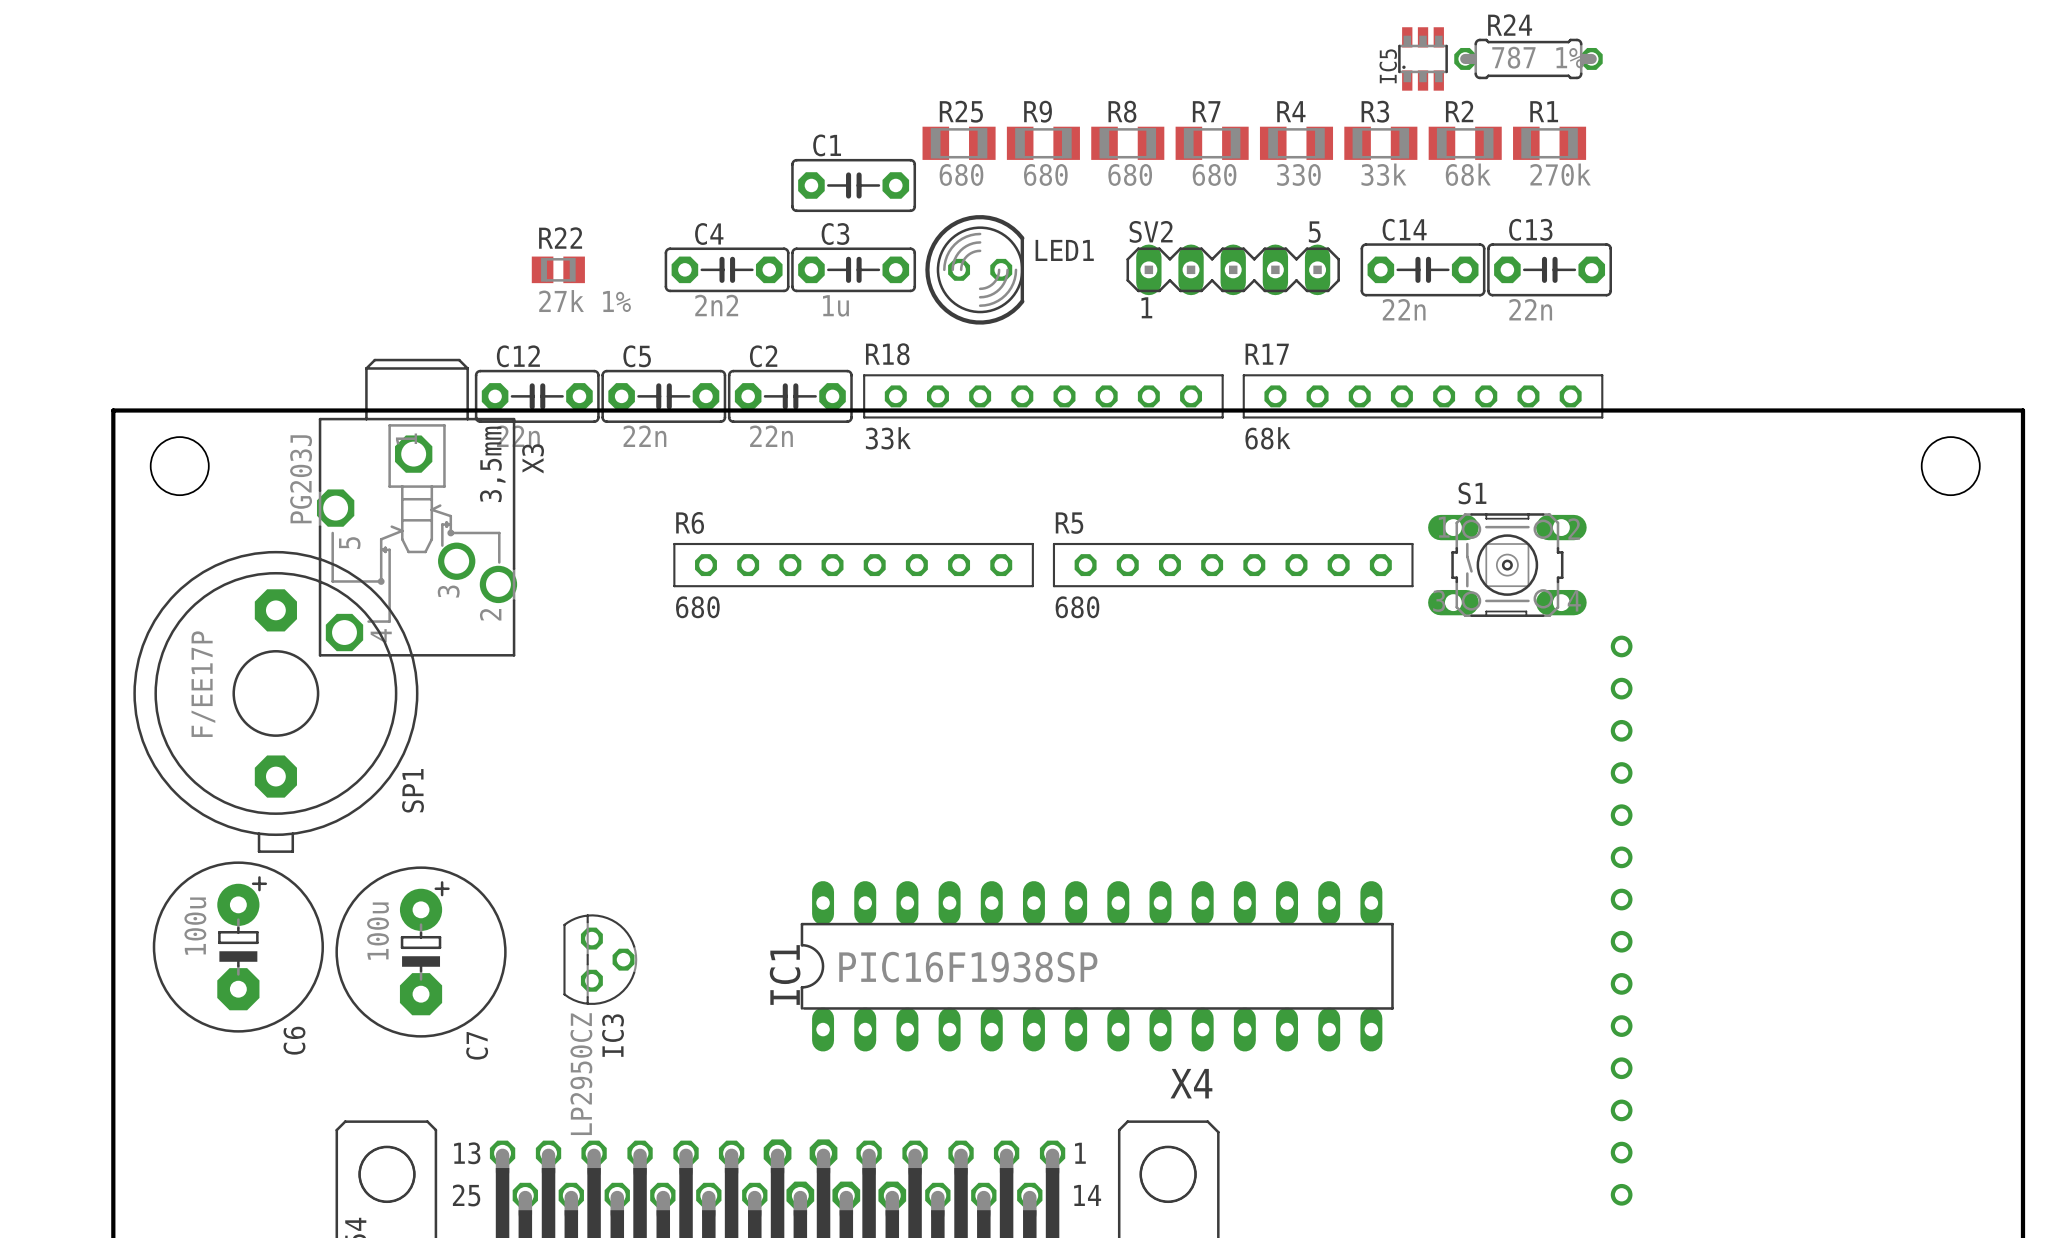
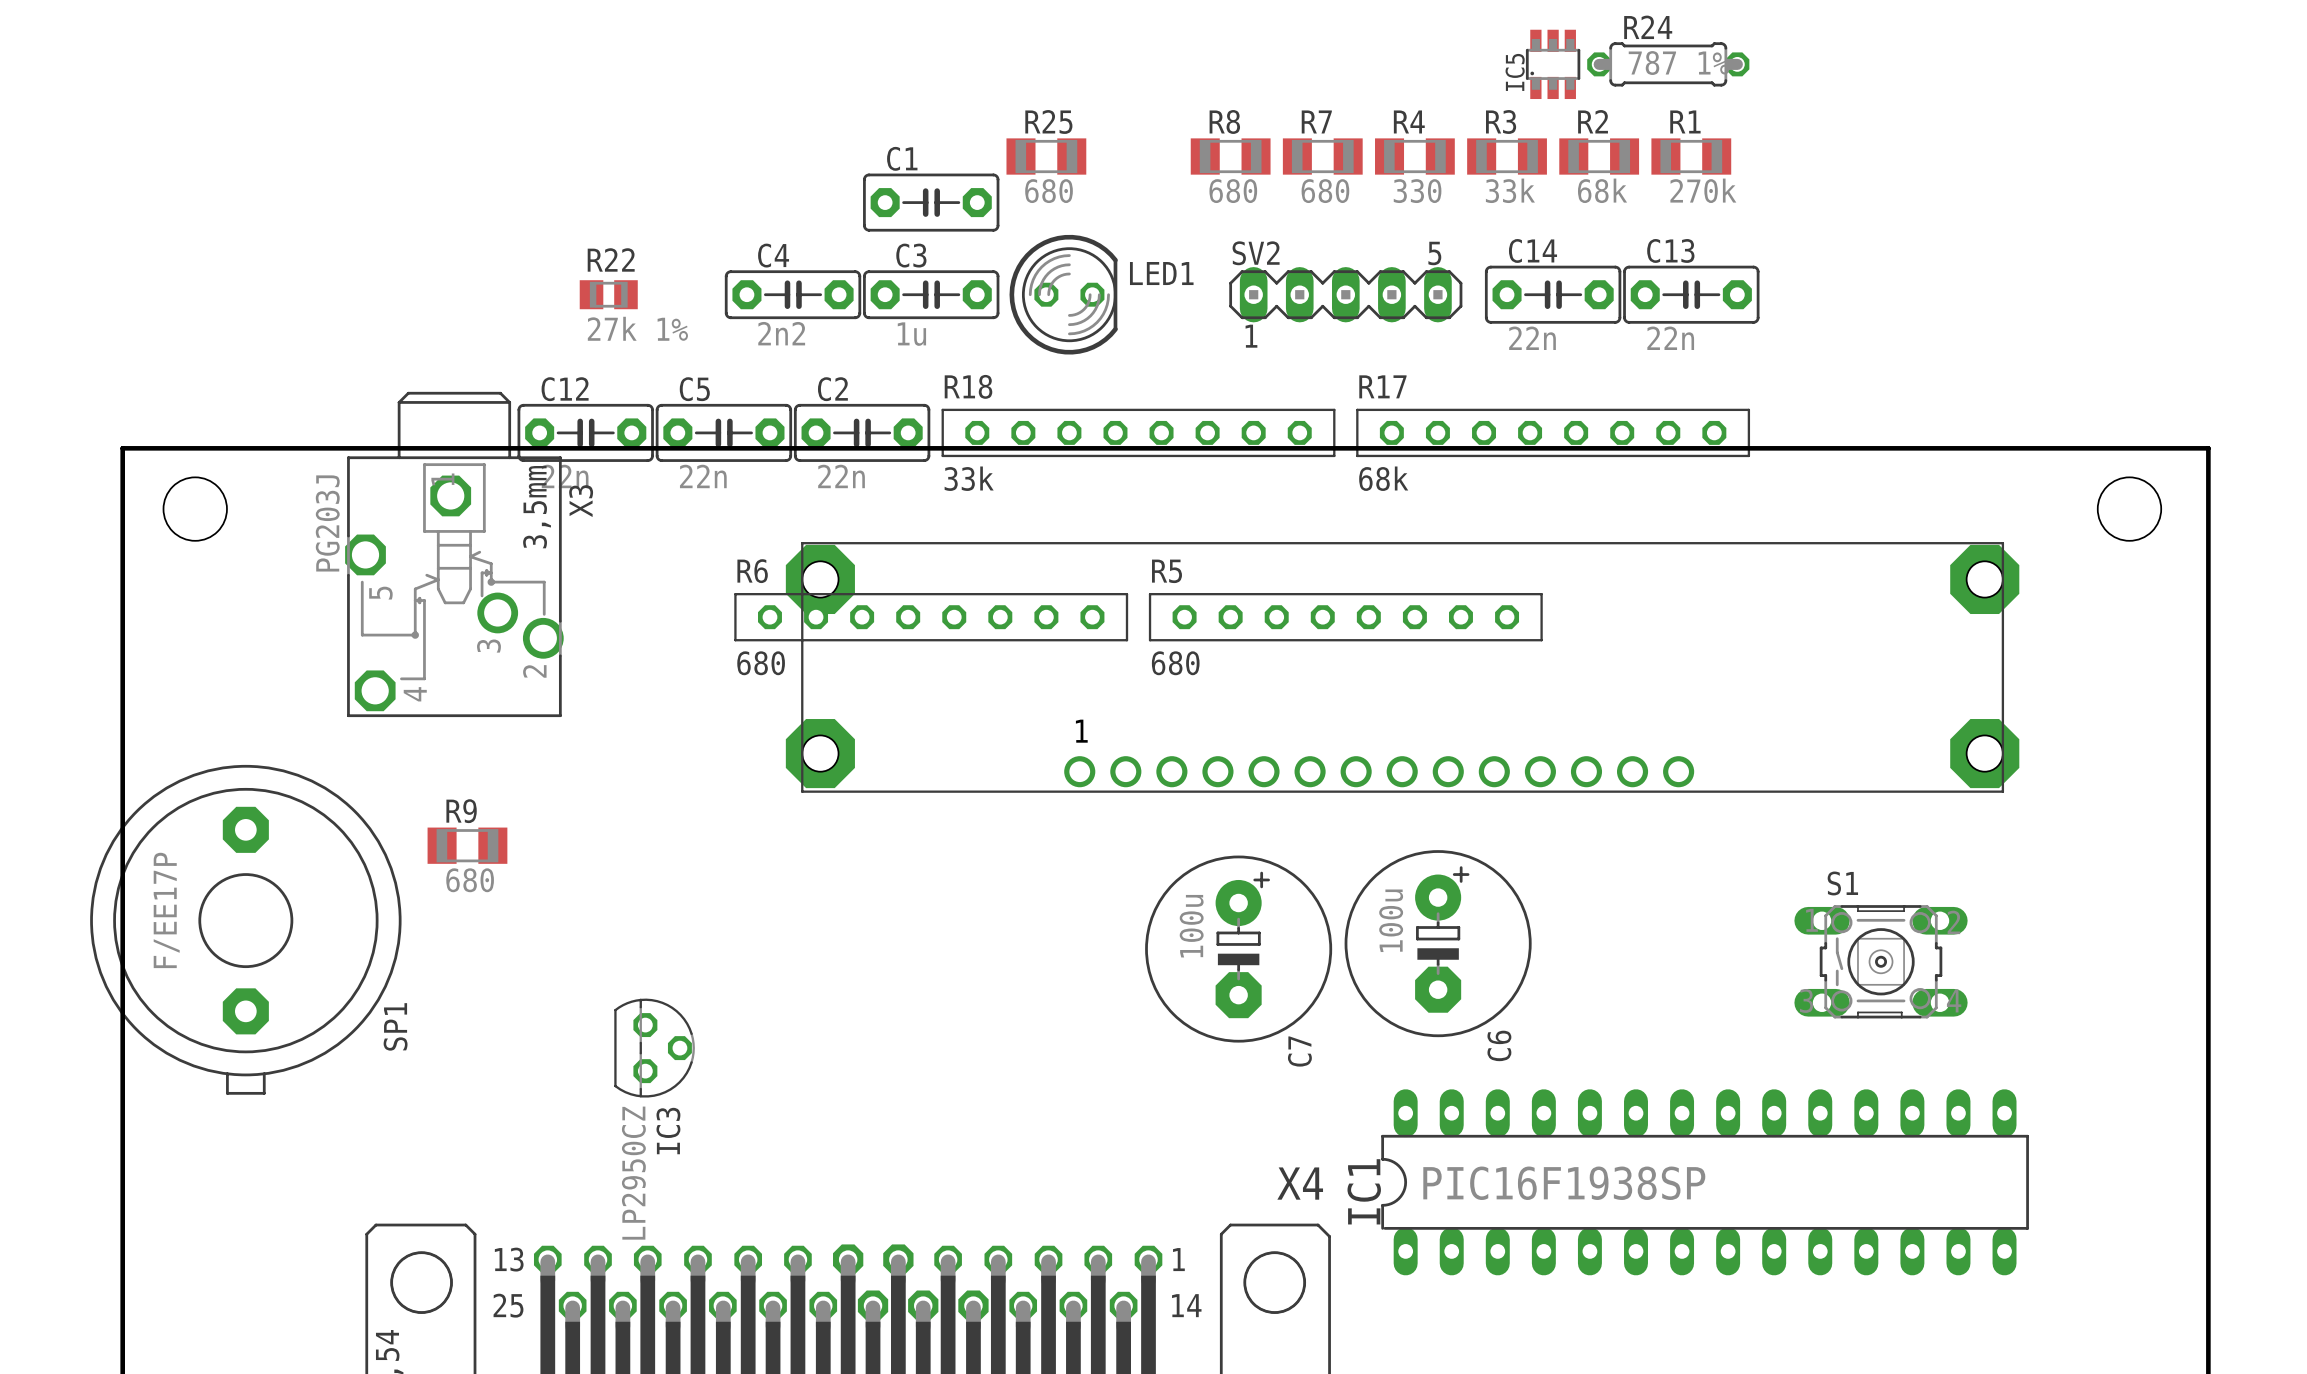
R9 position: (1043, 143) -> (467, 845)
S1 position: (1507, 565) -> (1881, 961)
part: none -> (1402, 667)
SP1 position: (275, 701) -> (245, 929)
part: (1621, 920) -> none
C6 position: (238, 947) -> (1438, 943)
C7 position: (421, 952) -> (1238, 949)
IC1 position: (1097, 966) -> (1705, 1182)

